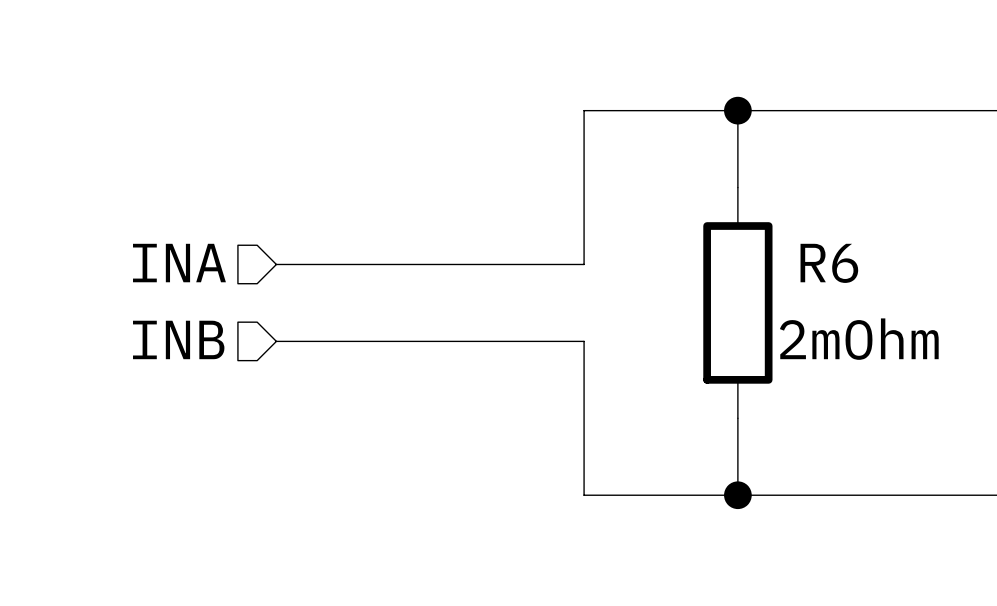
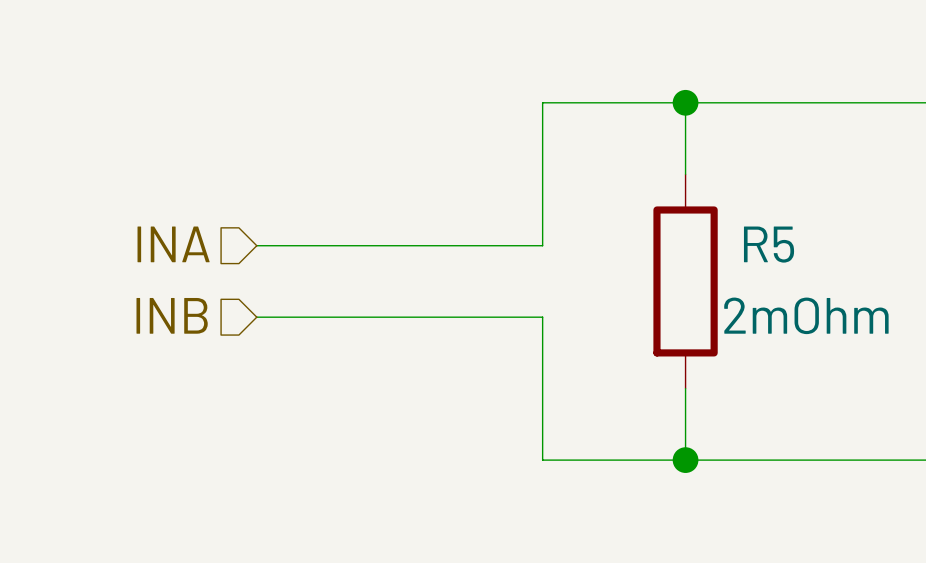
R6 name: R6 (829, 263) -> R5 (769, 244)

